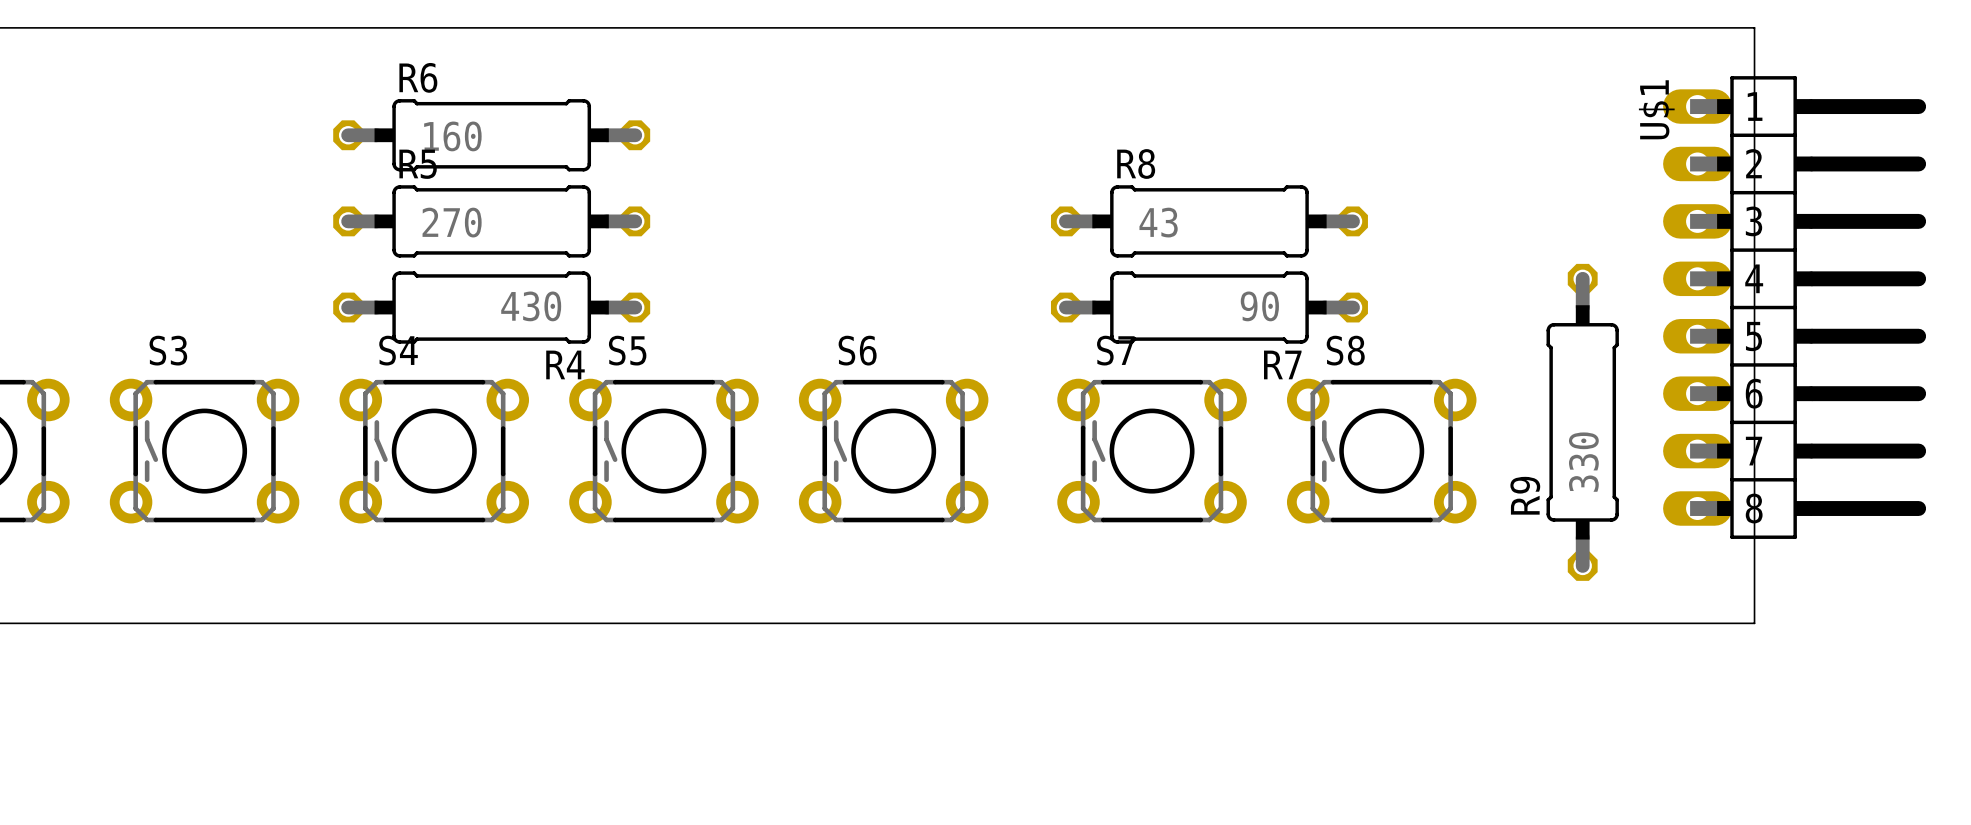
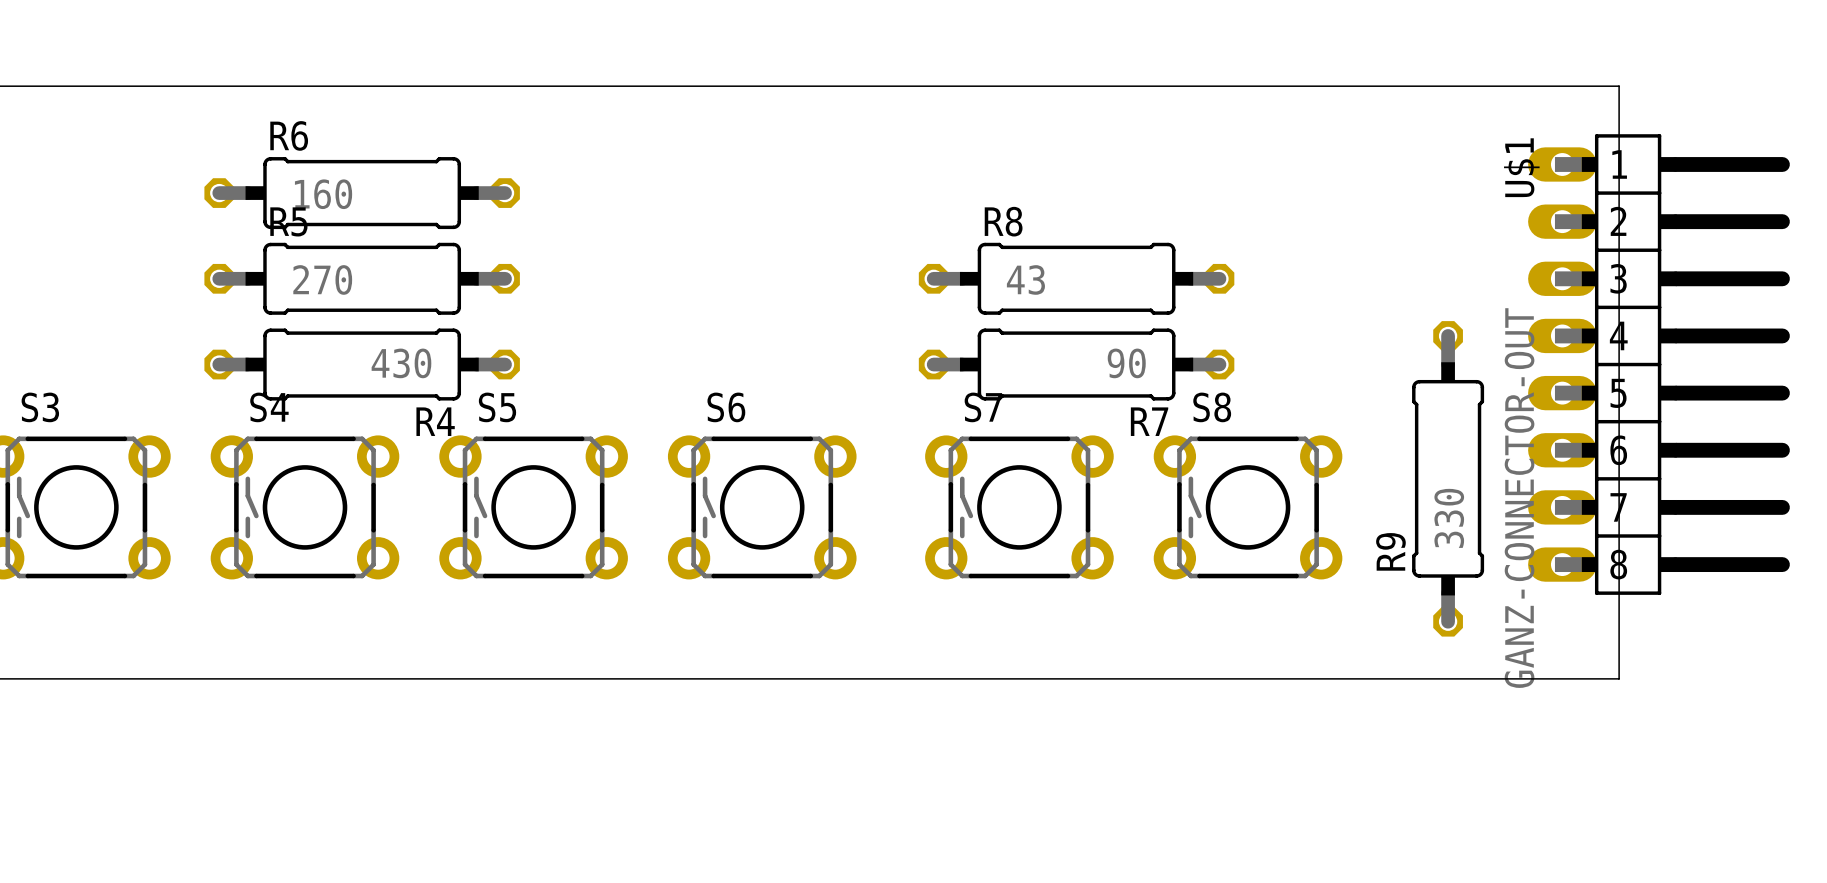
U$1 value: none -> GANZ-CONNECTOR-OUT (1519, 498)

